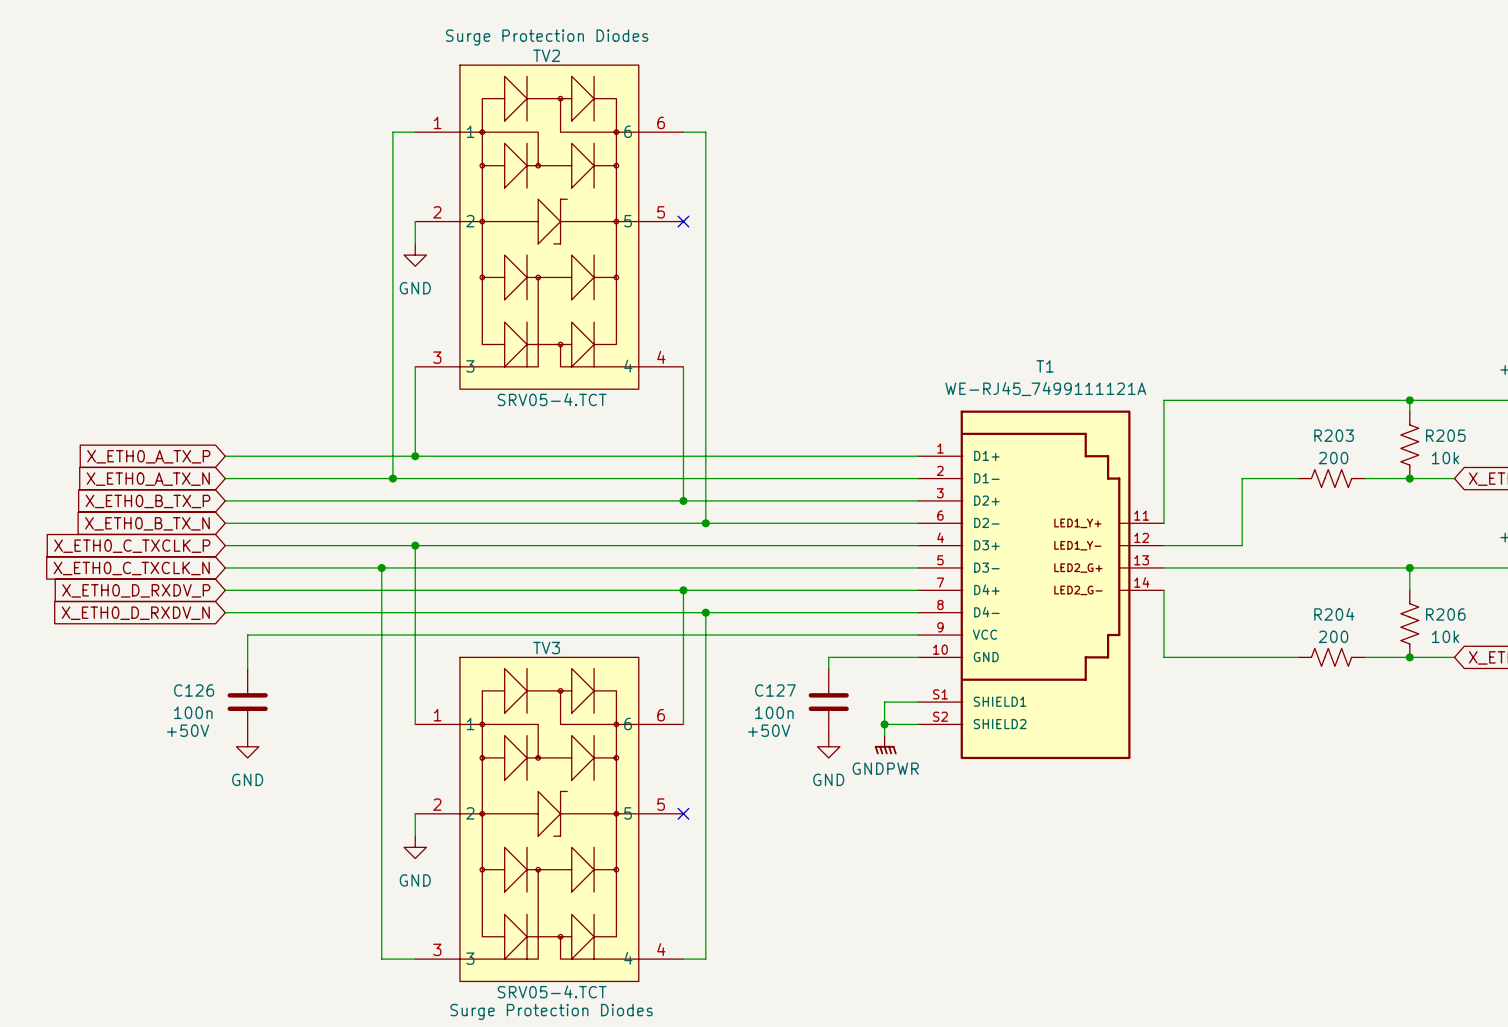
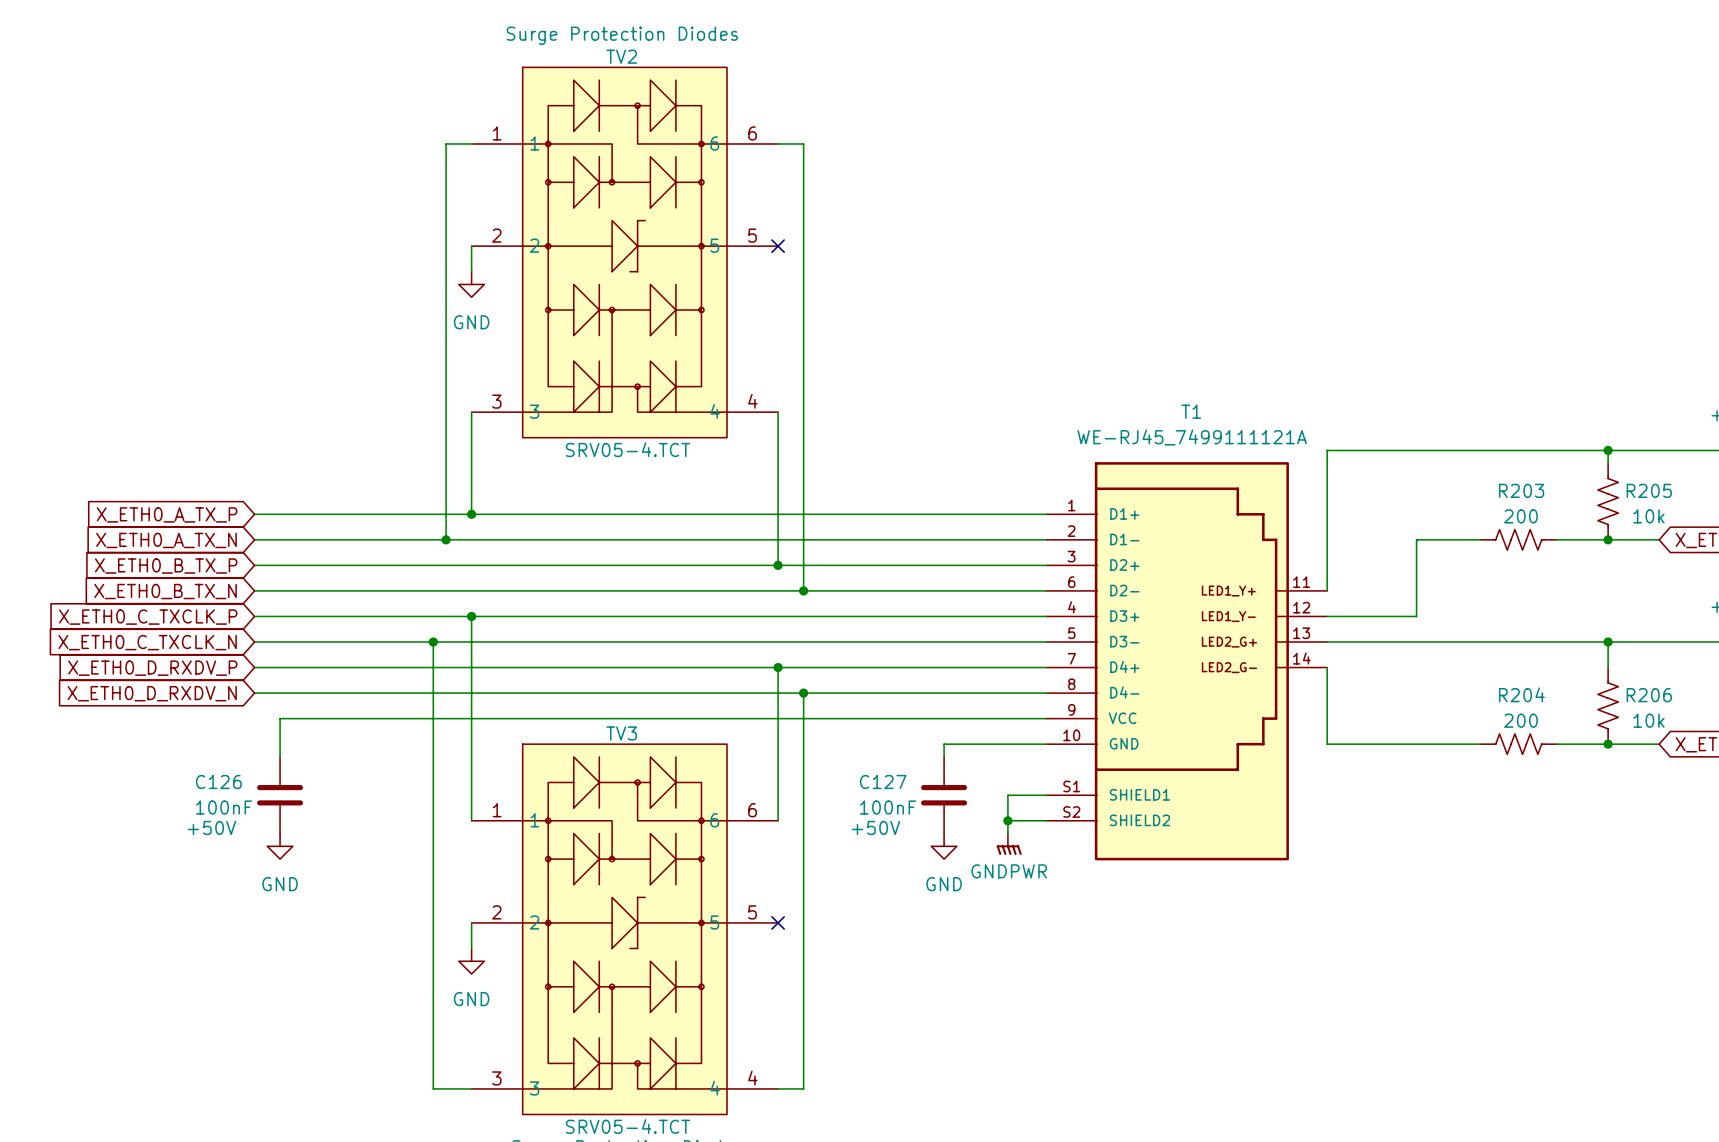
C126 value: 100n (193, 712) -> 100nF (224, 807)
C127 value: 100n (774, 712) -> 100nF (888, 807)

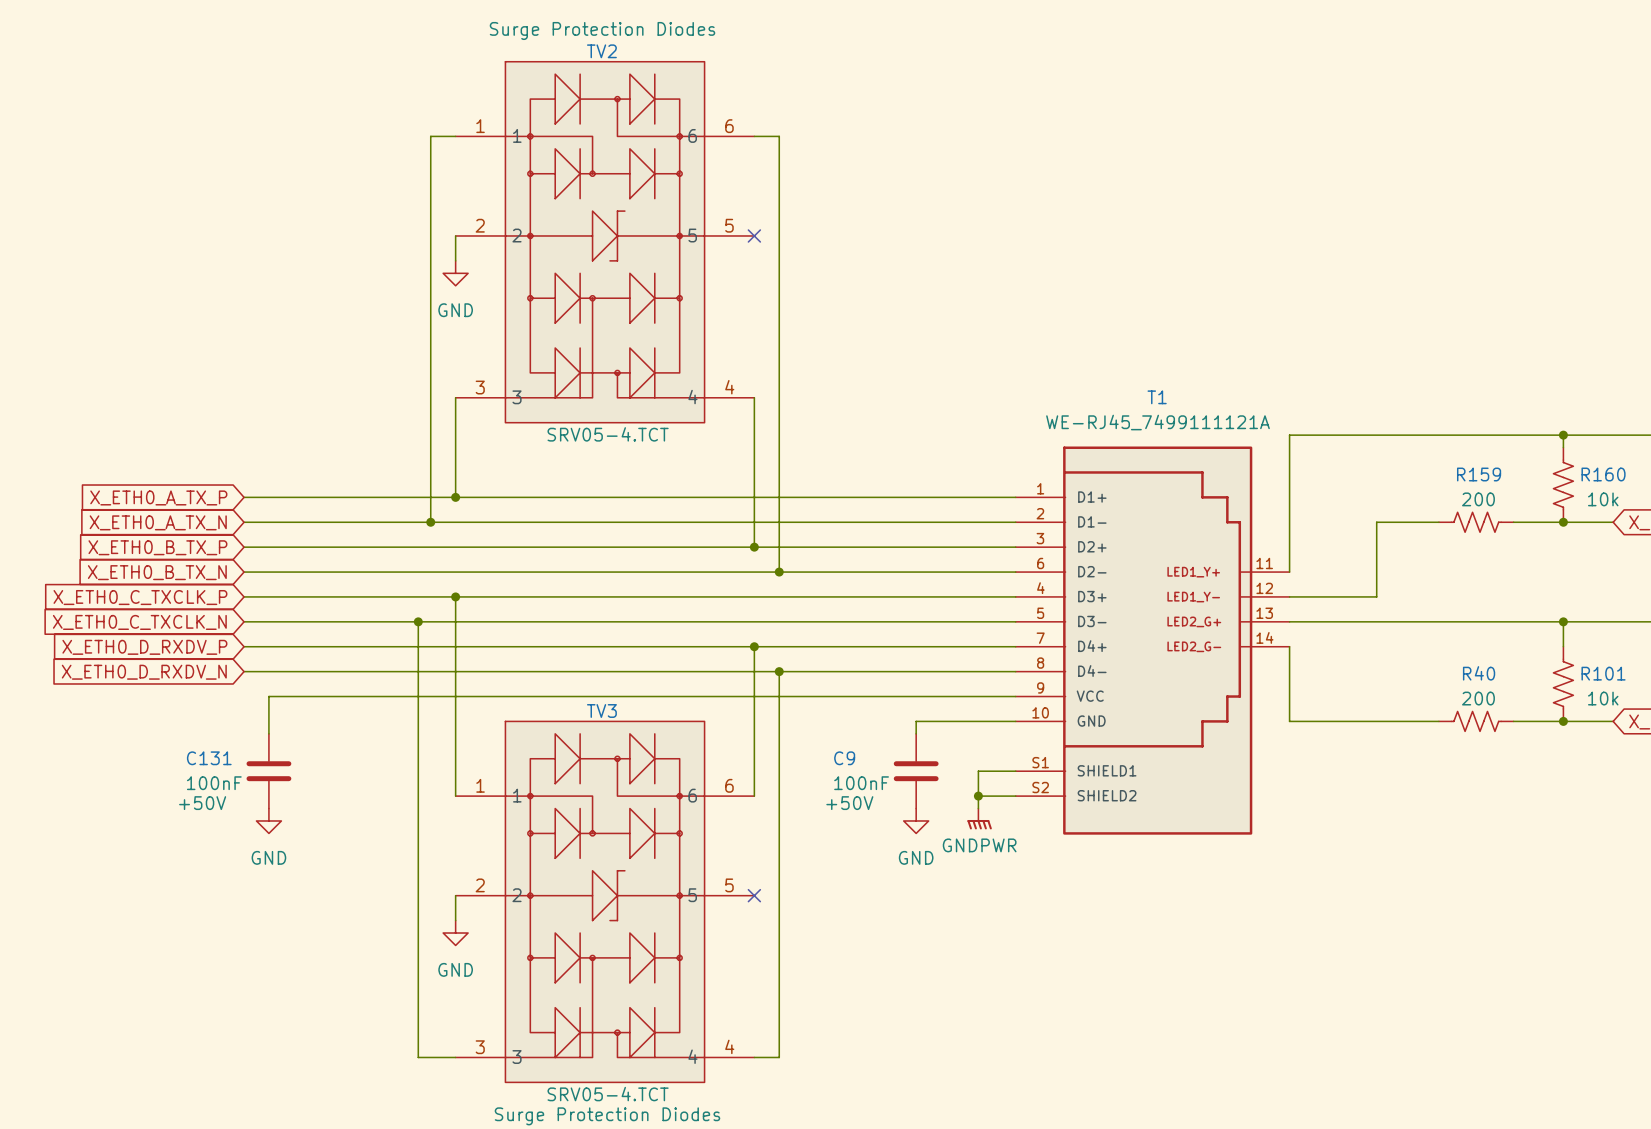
R203 name: R203 (1521, 490) -> R159 (1479, 474)
R205 name: R205 (1649, 490) -> R160 (1603, 474)
R204 name: R204 (1521, 694) -> R40 (1479, 673)
R206 name: R206 (1649, 695) -> R101 (1603, 673)
C126 name: C126 (218, 782) -> C131 (209, 758)
C127 name: C127 (883, 782) -> C9 (844, 758)

